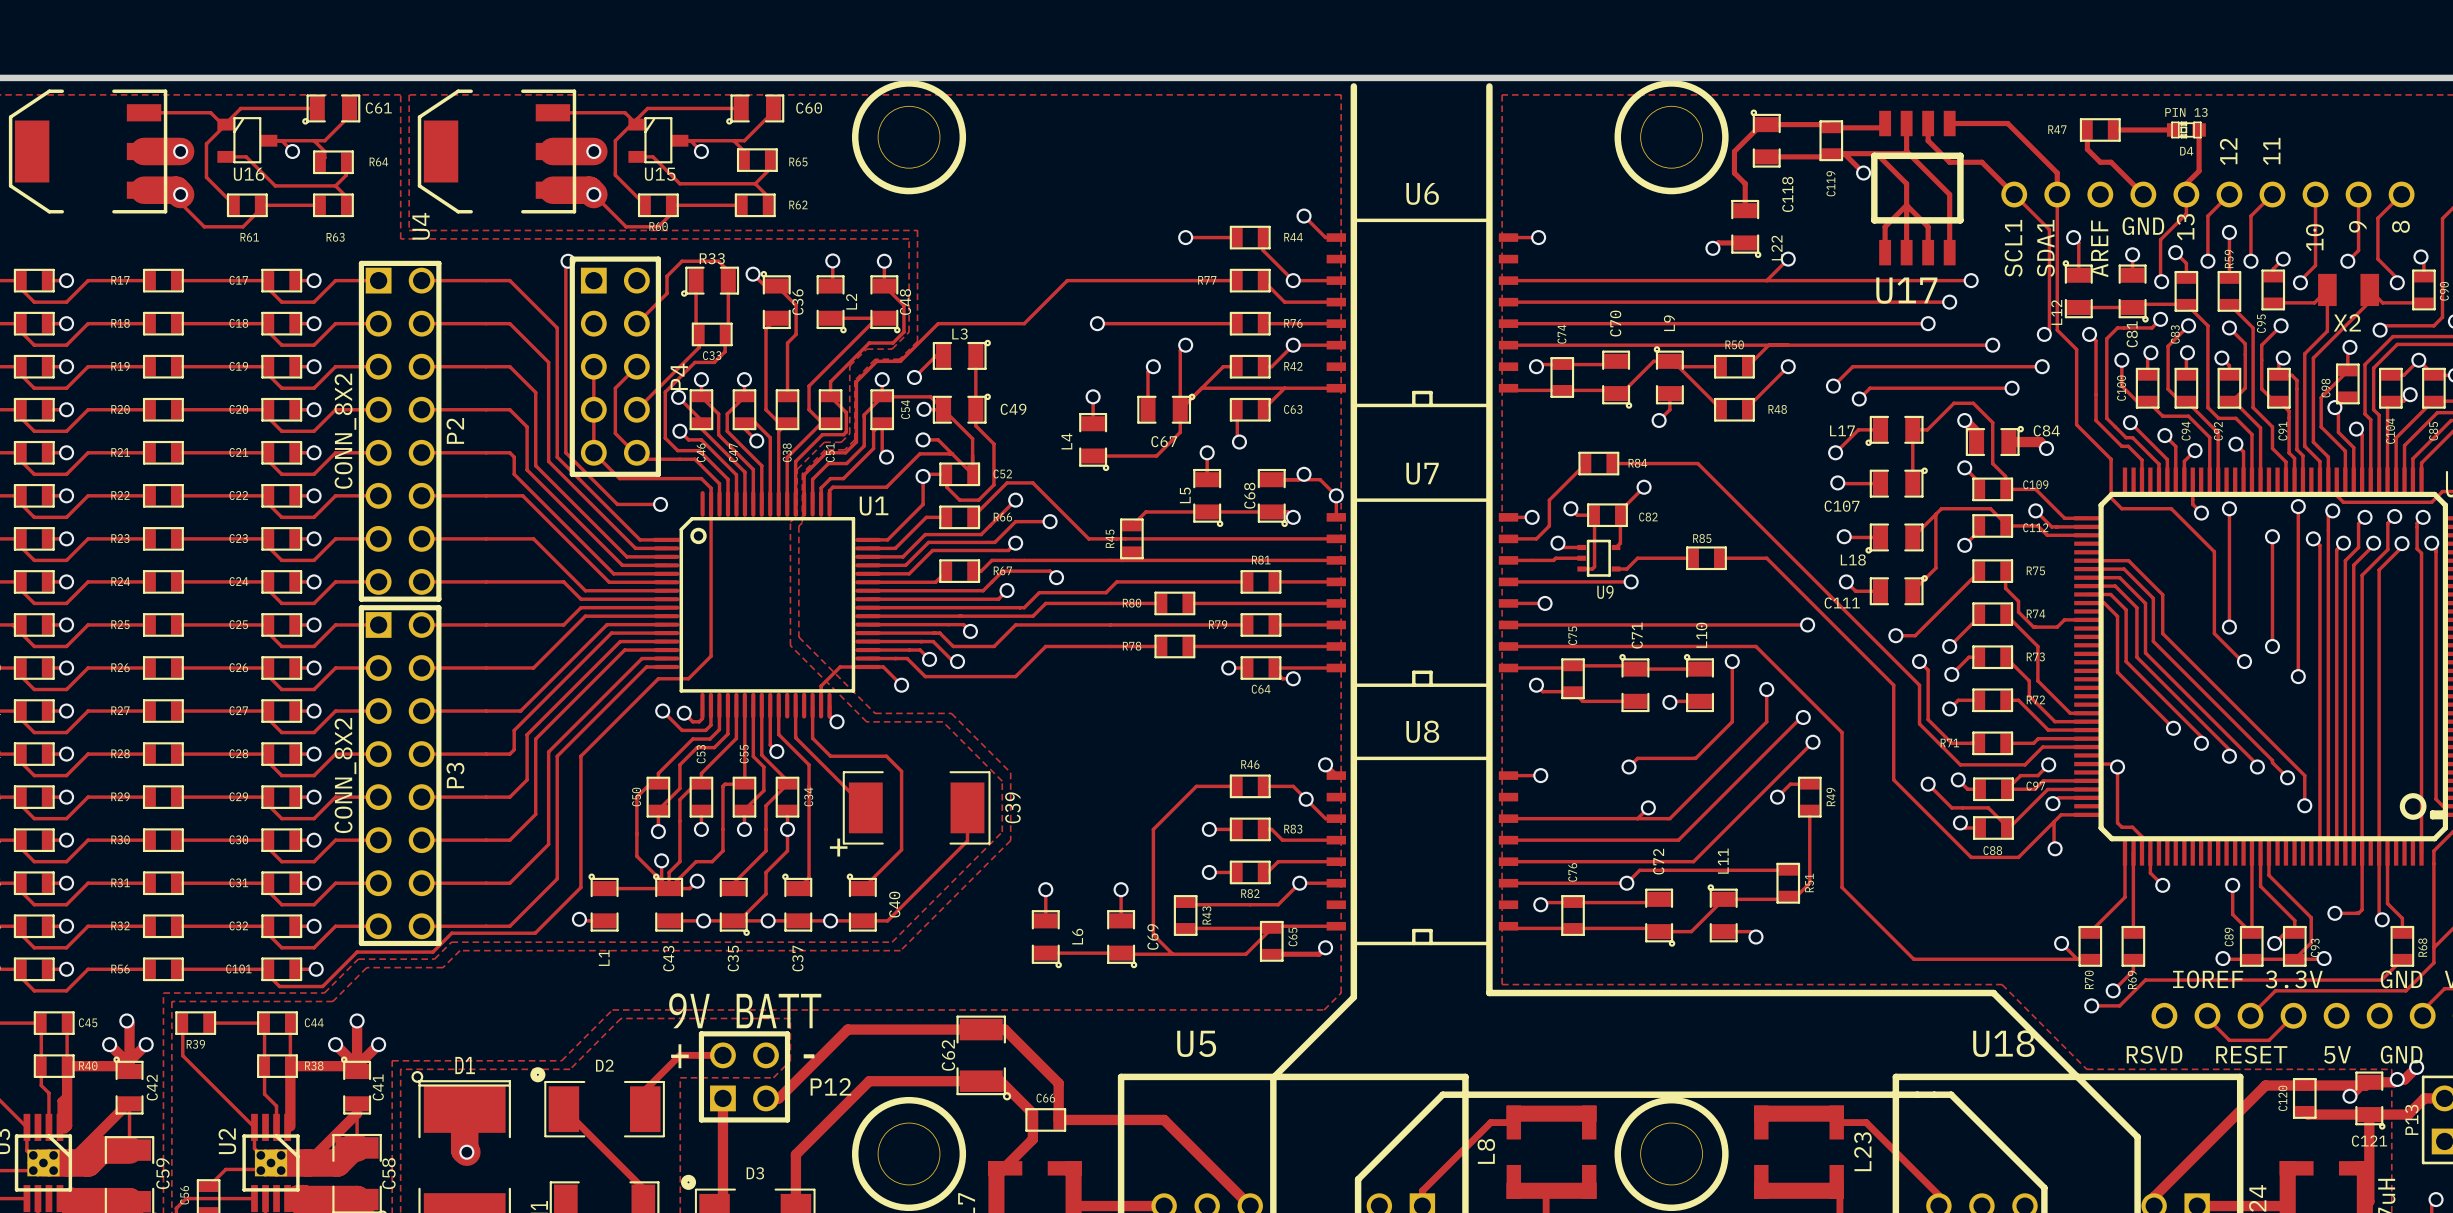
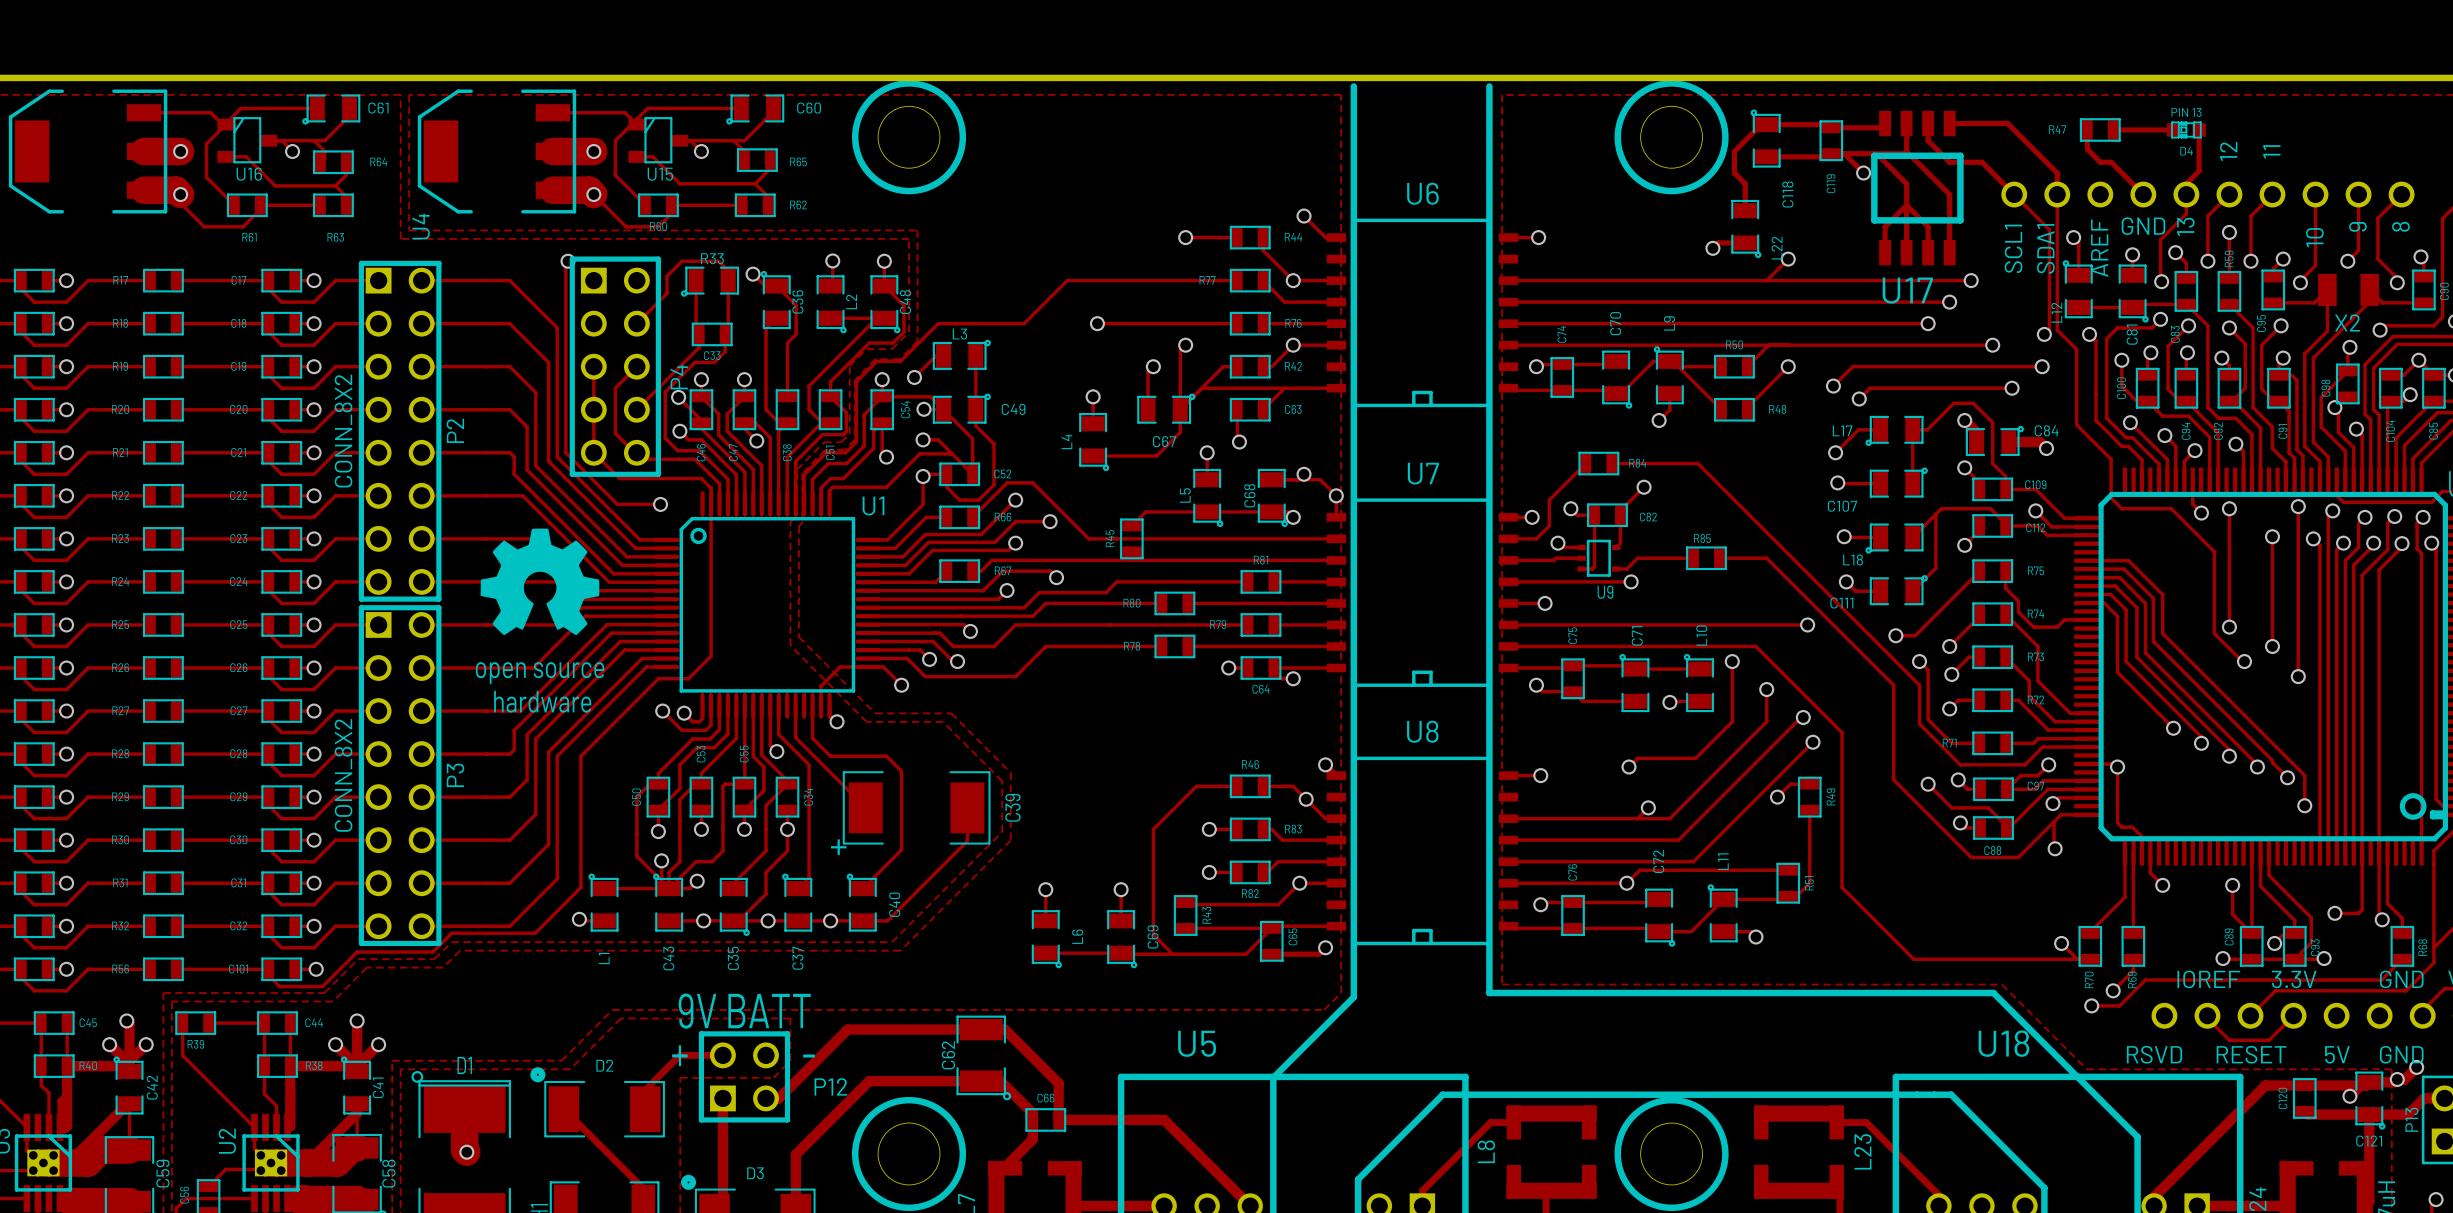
drawing: none -> [480, 528, 600, 636]
text: none -> open source (540, 673)
text: none -> hardware (542, 701)

